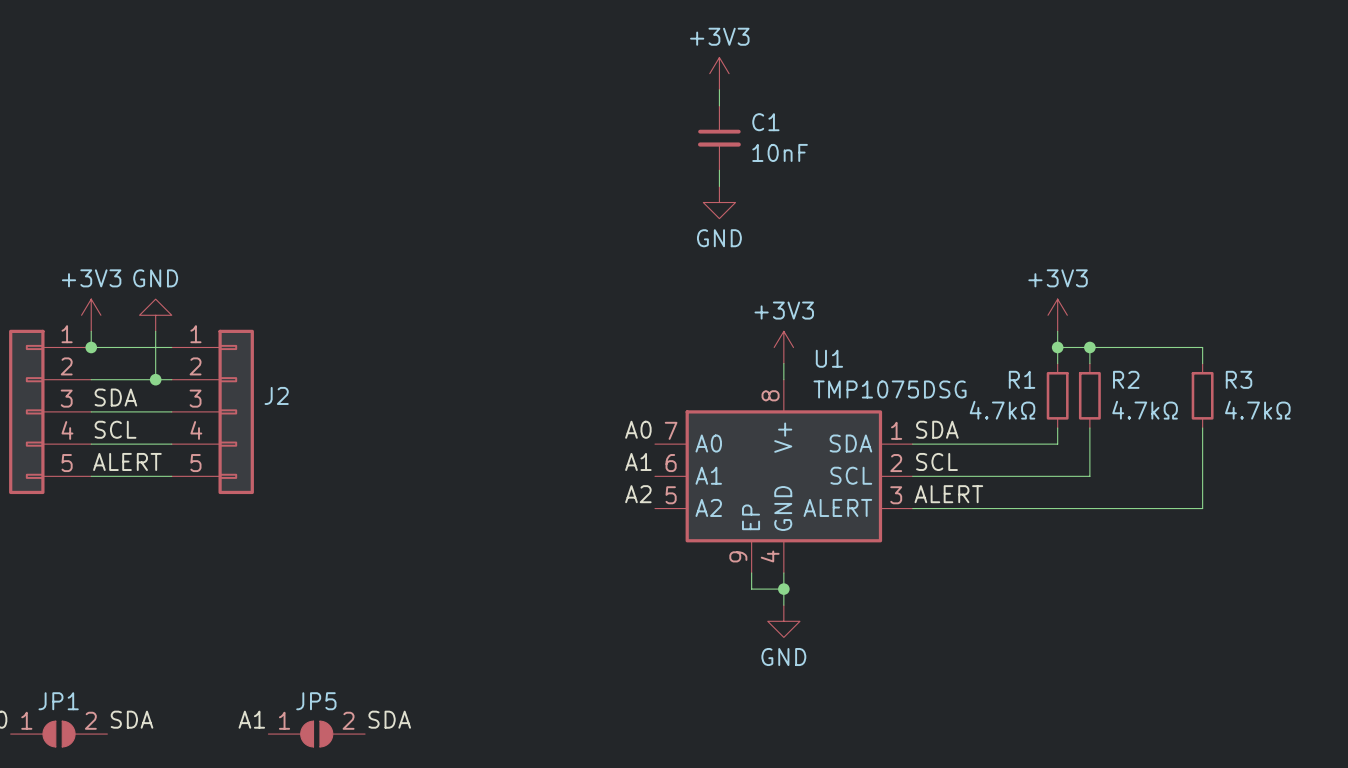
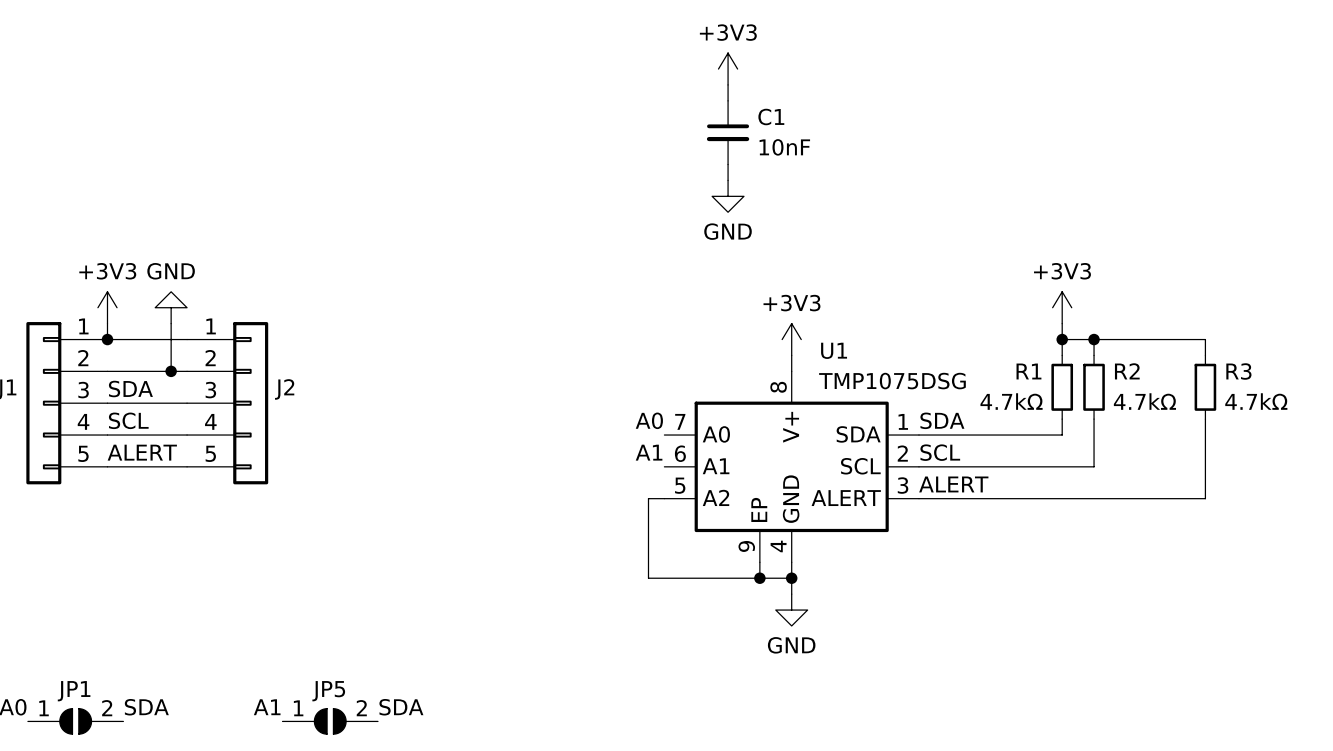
label: A2 (638, 494) -> none
wire: none -> (664, 498) (648, 498) (648, 578) (759, 578)
junction: none -> (759, 578)

